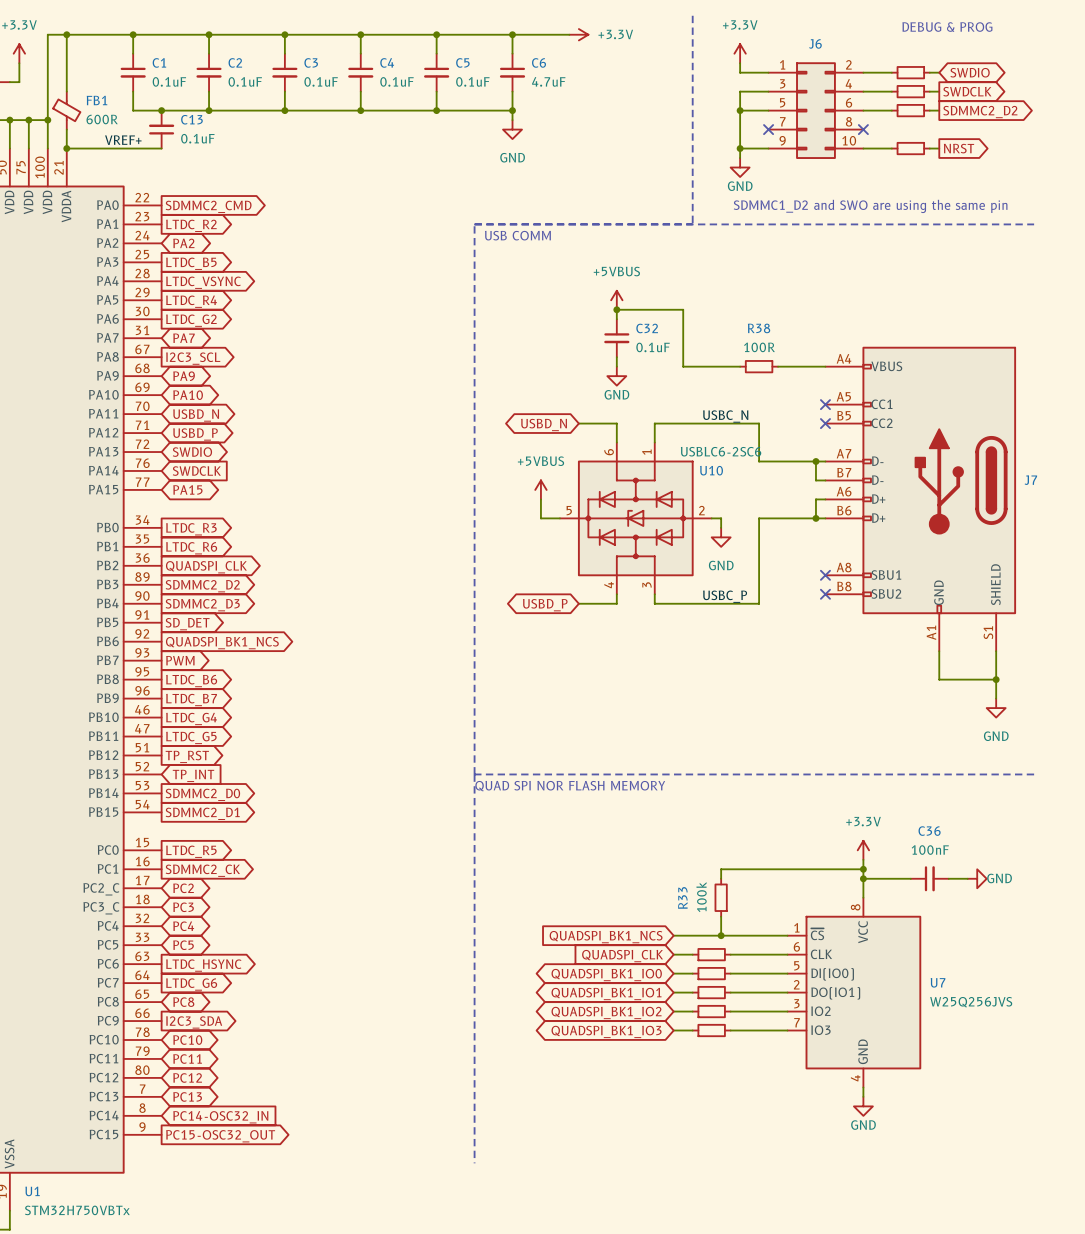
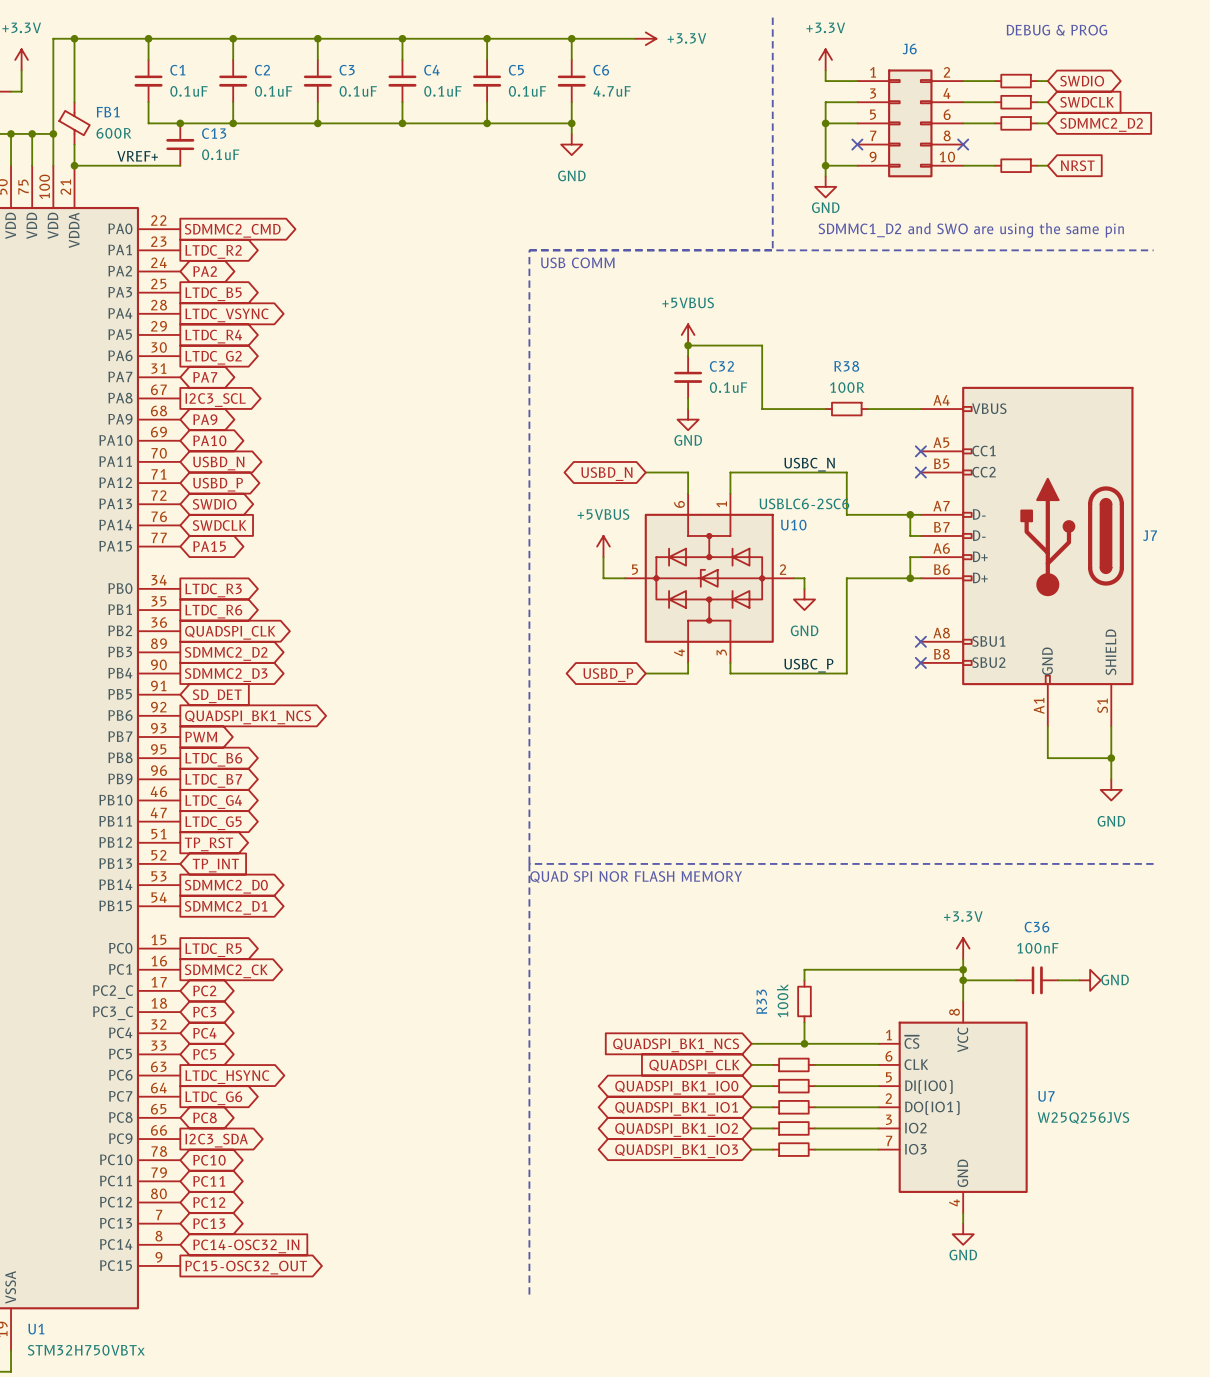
global label shape: output (967, 91) -> input (1087, 102)
global label shape: output (980, 112) -> input (1101, 124)
global label shape: output (959, 148) -> input (1077, 165)
global label shape: output (187, 624) -> input (217, 696)

